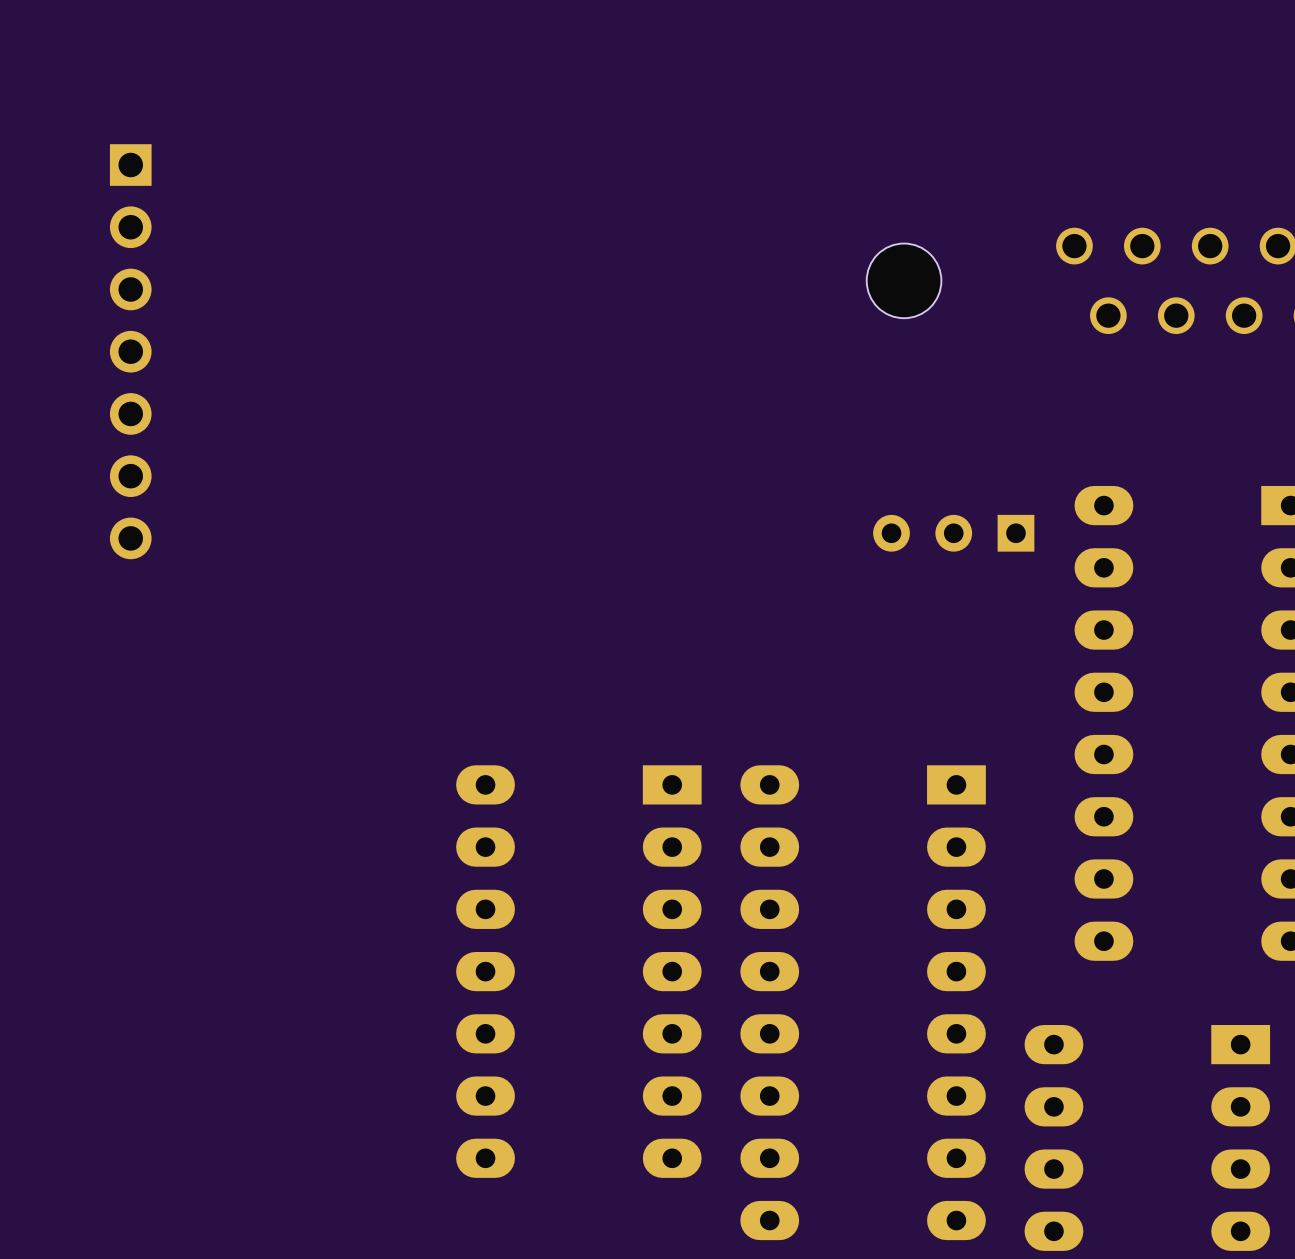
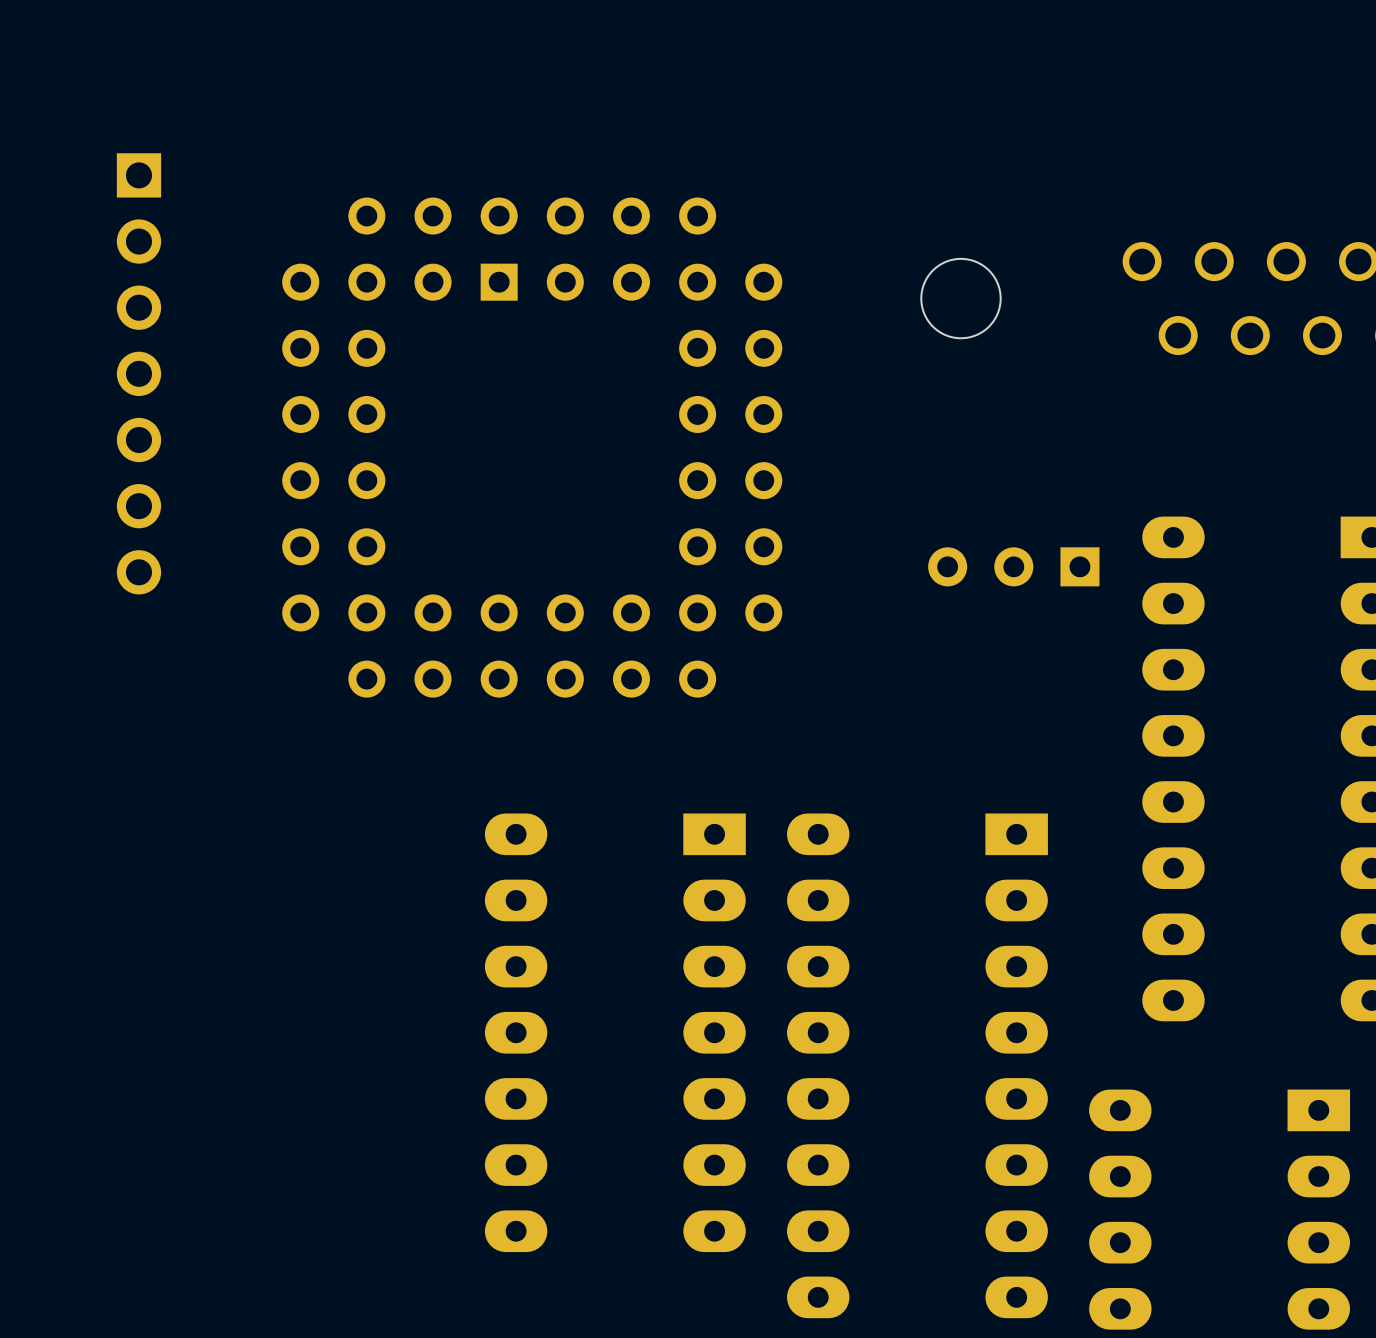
part: none -> (532, 447)

